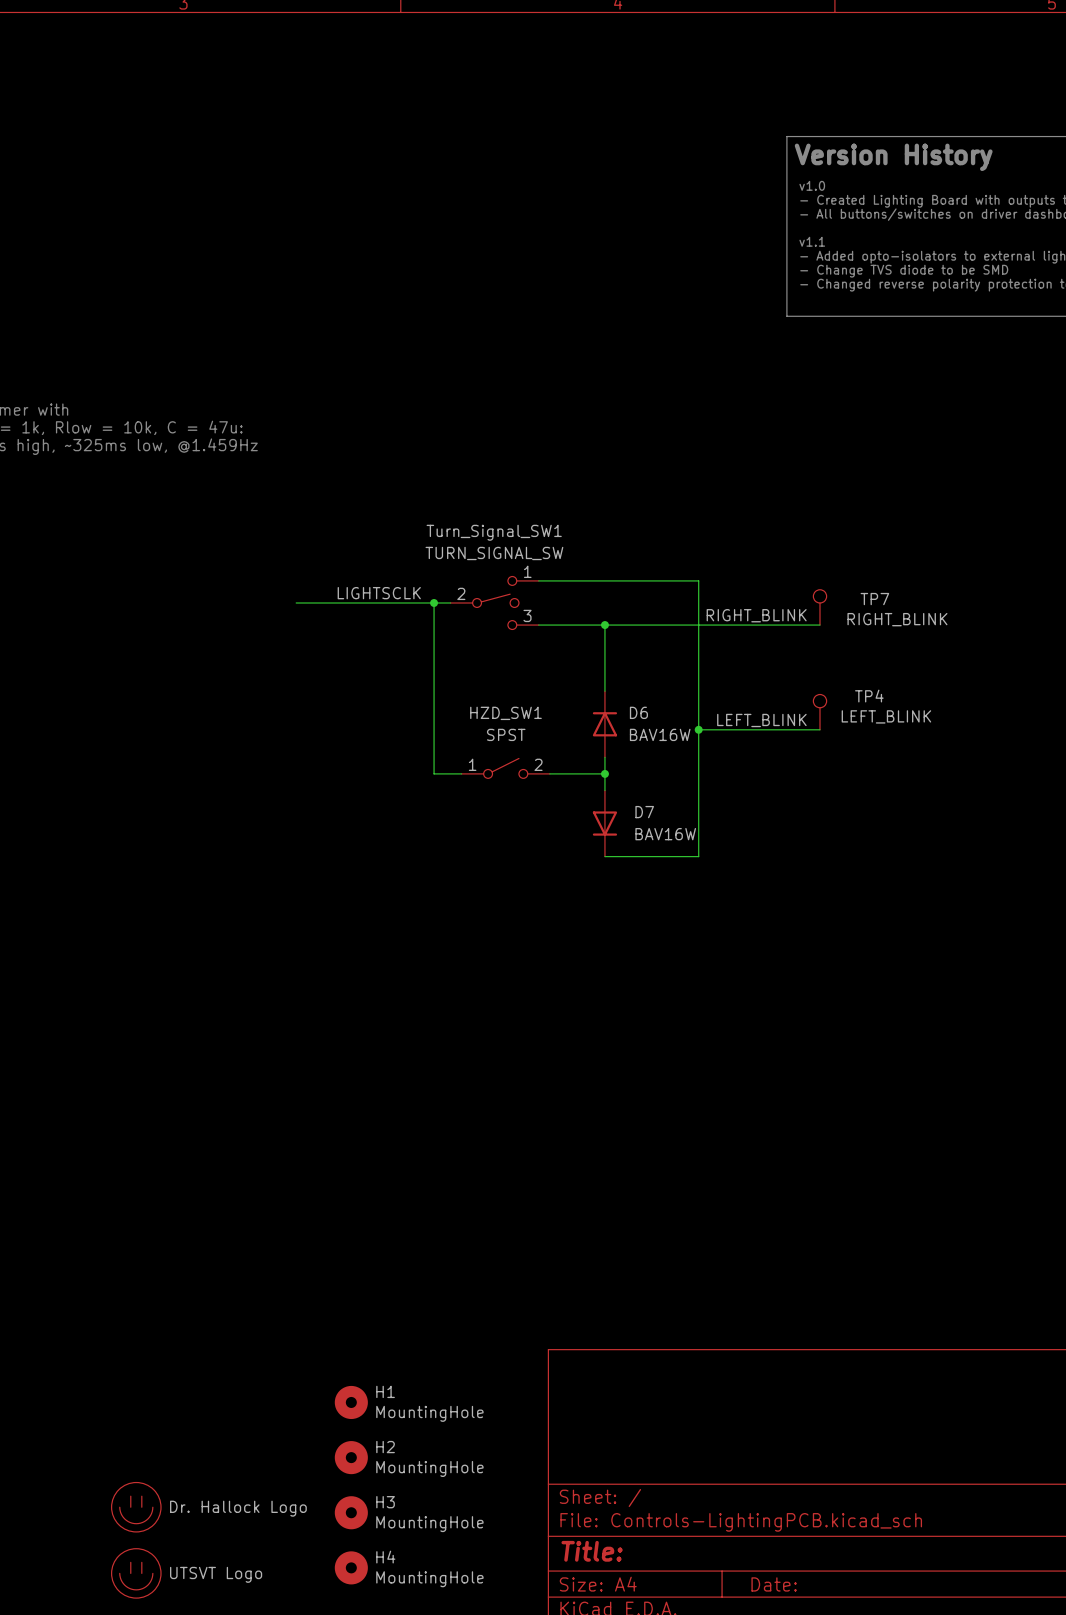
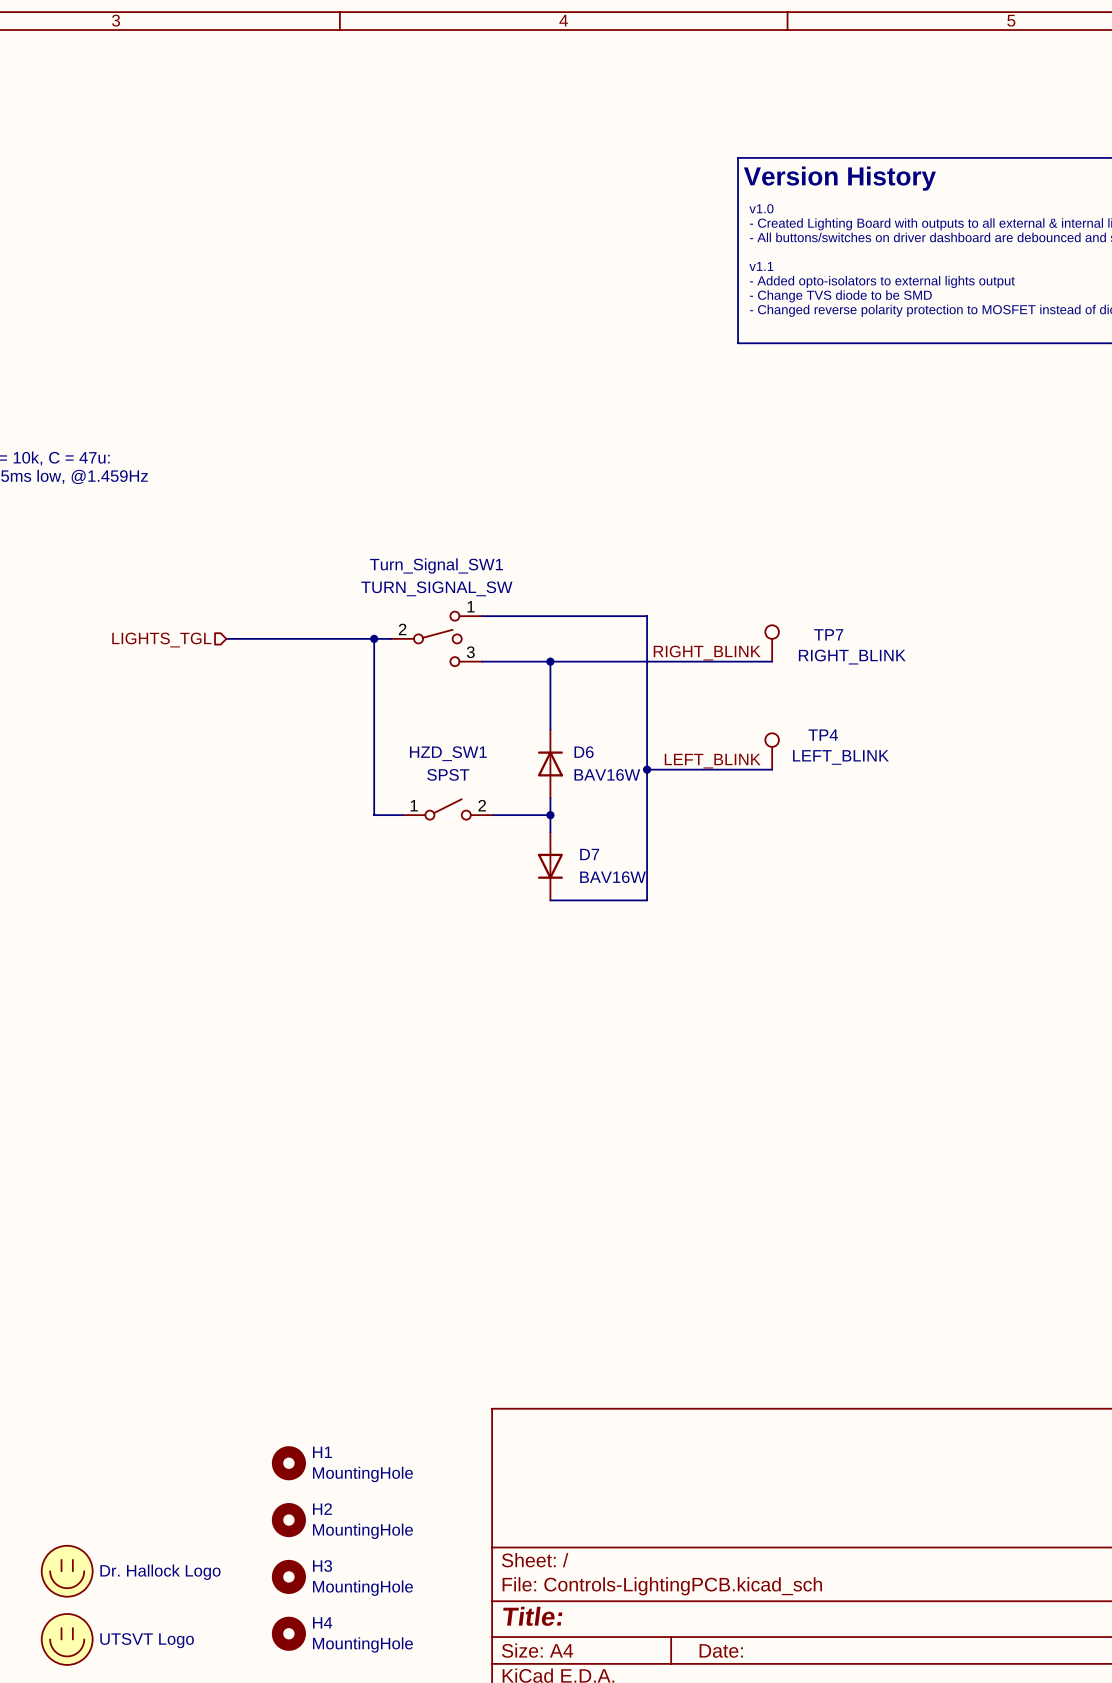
label: LIGHTSCLK (379, 593) -> none
wire: none -> (226, 638) (232, 638)
hierarchical label: none -> LIGHTS_TGL (161, 640)

